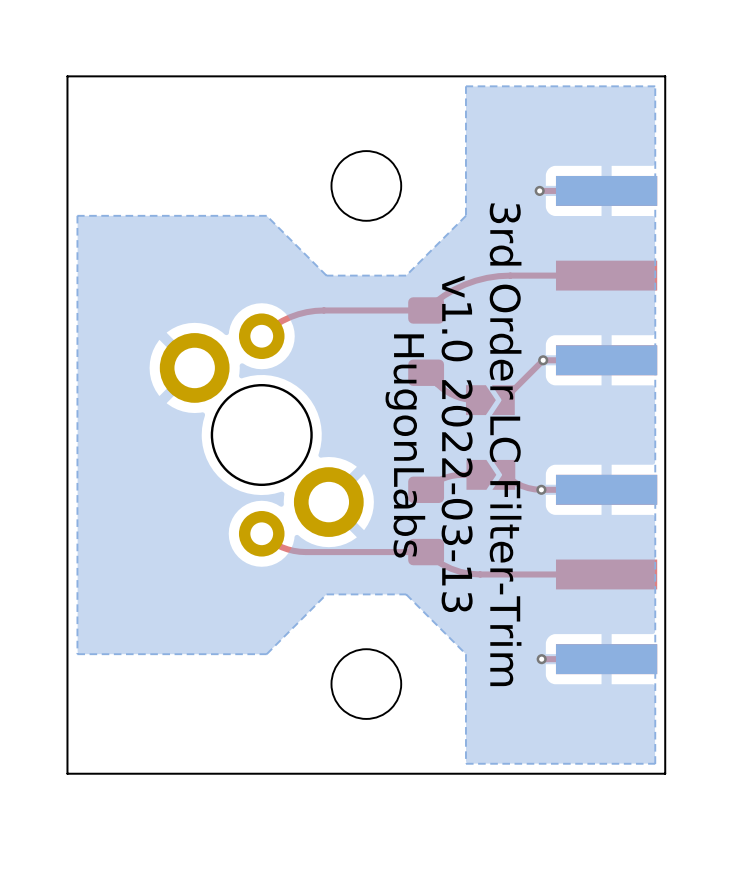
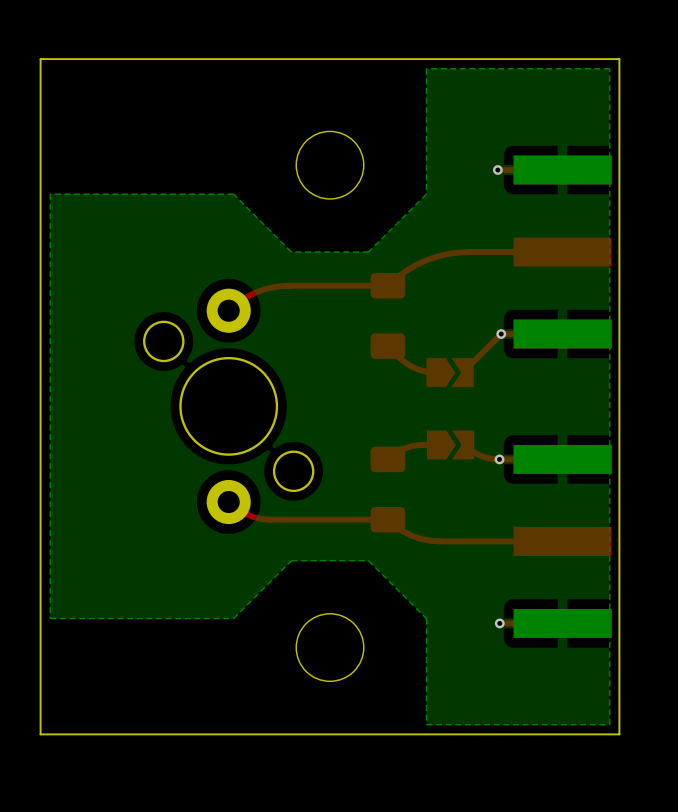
part footprint: [159, 313, 364, 557] -> [143, 288, 315, 525]
text: v1.0 2022-03-13 (457, 443) -> none
text: 3rd Order LC Filter-Trim (505, 444) -> none
text: HugonLabs (405, 445) -> none

